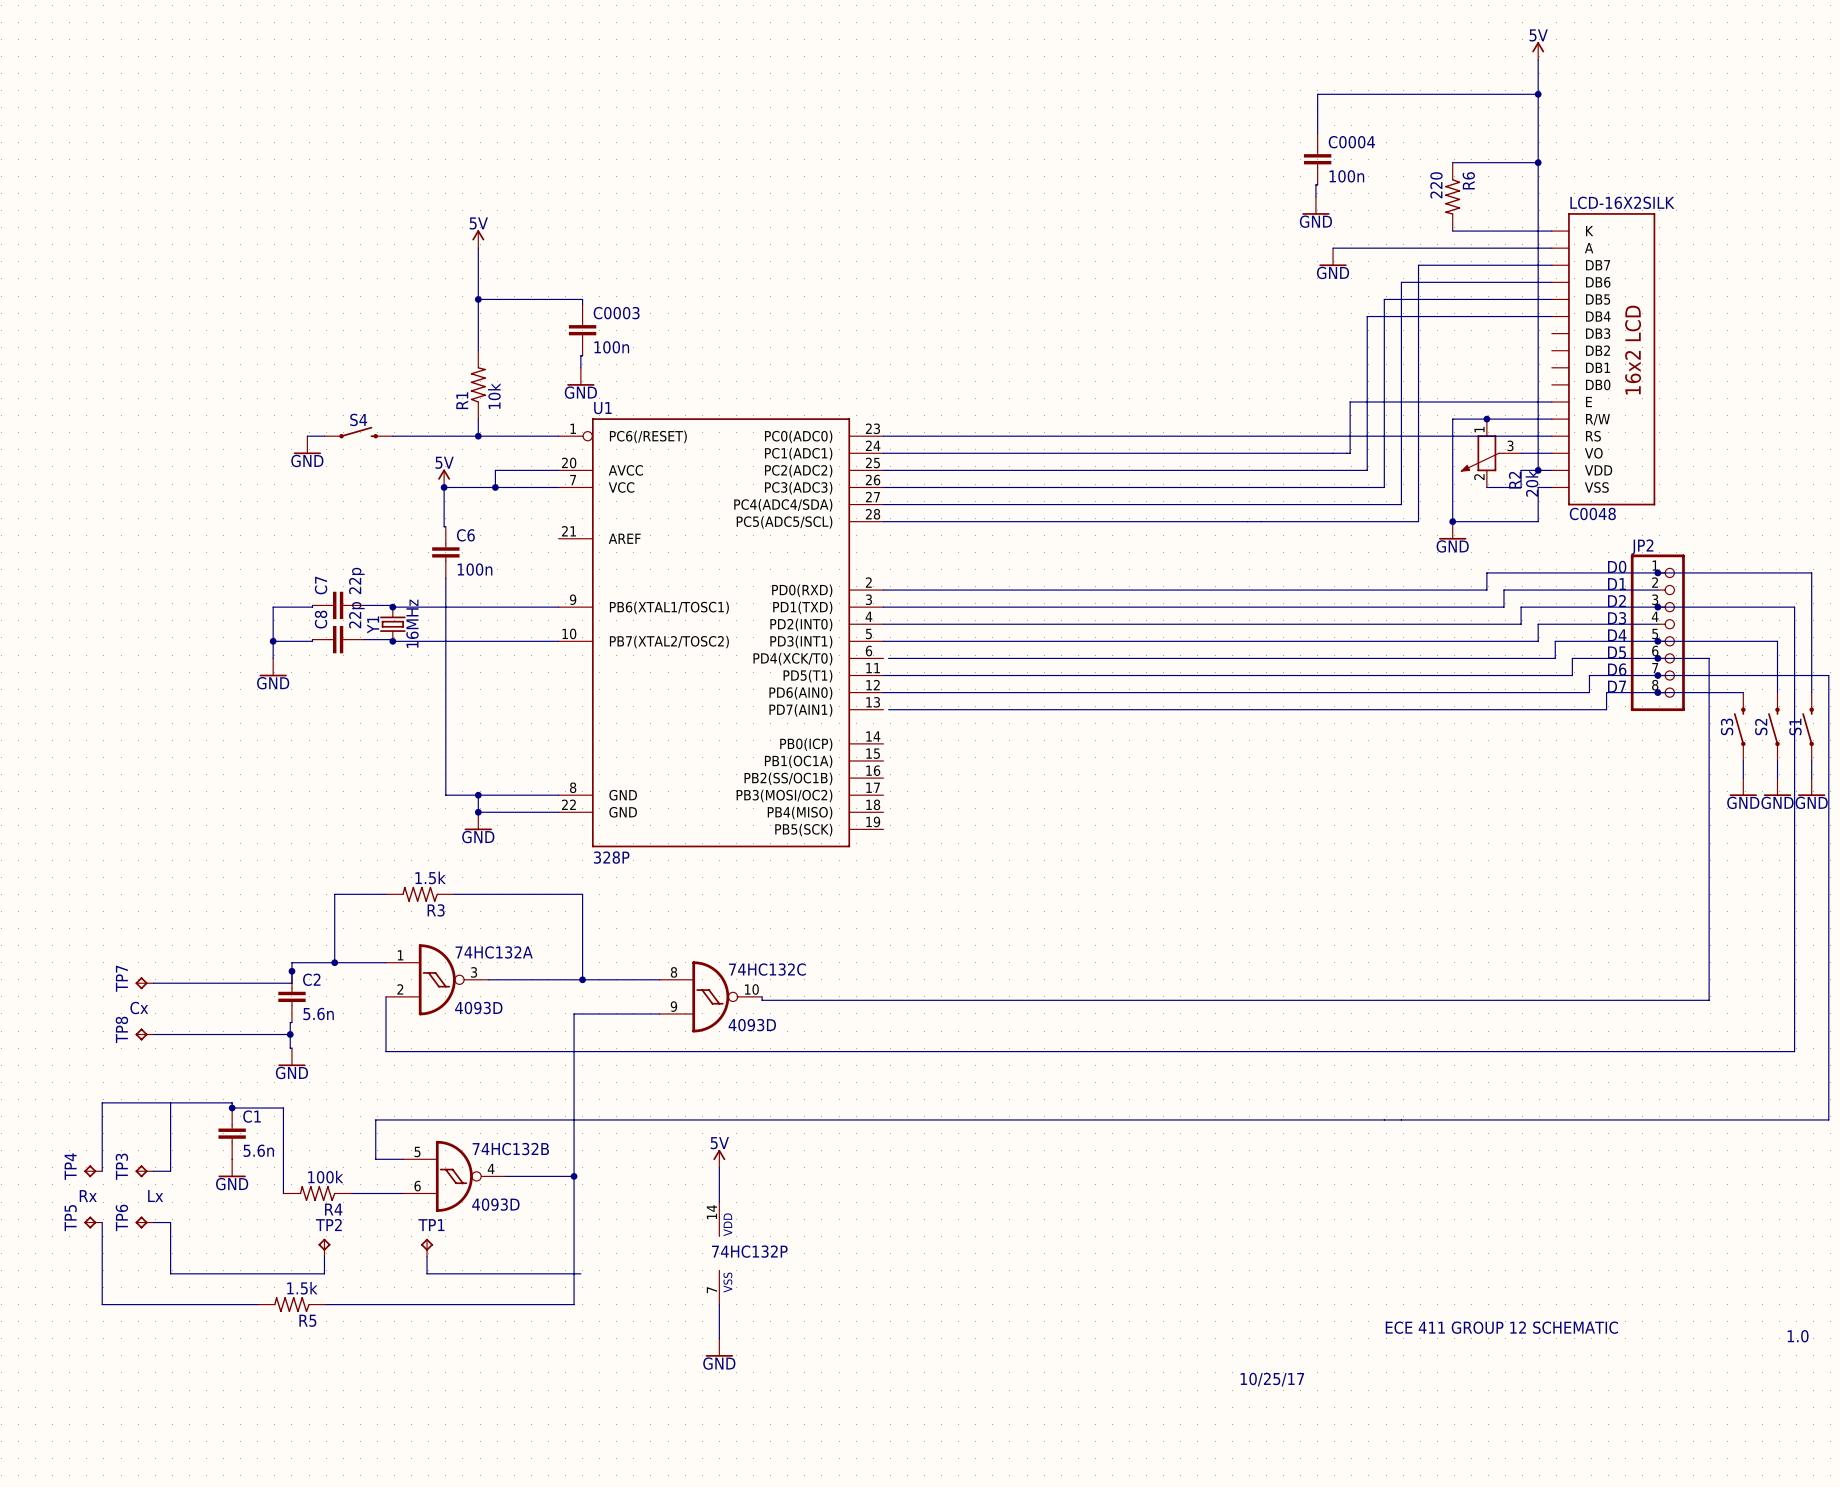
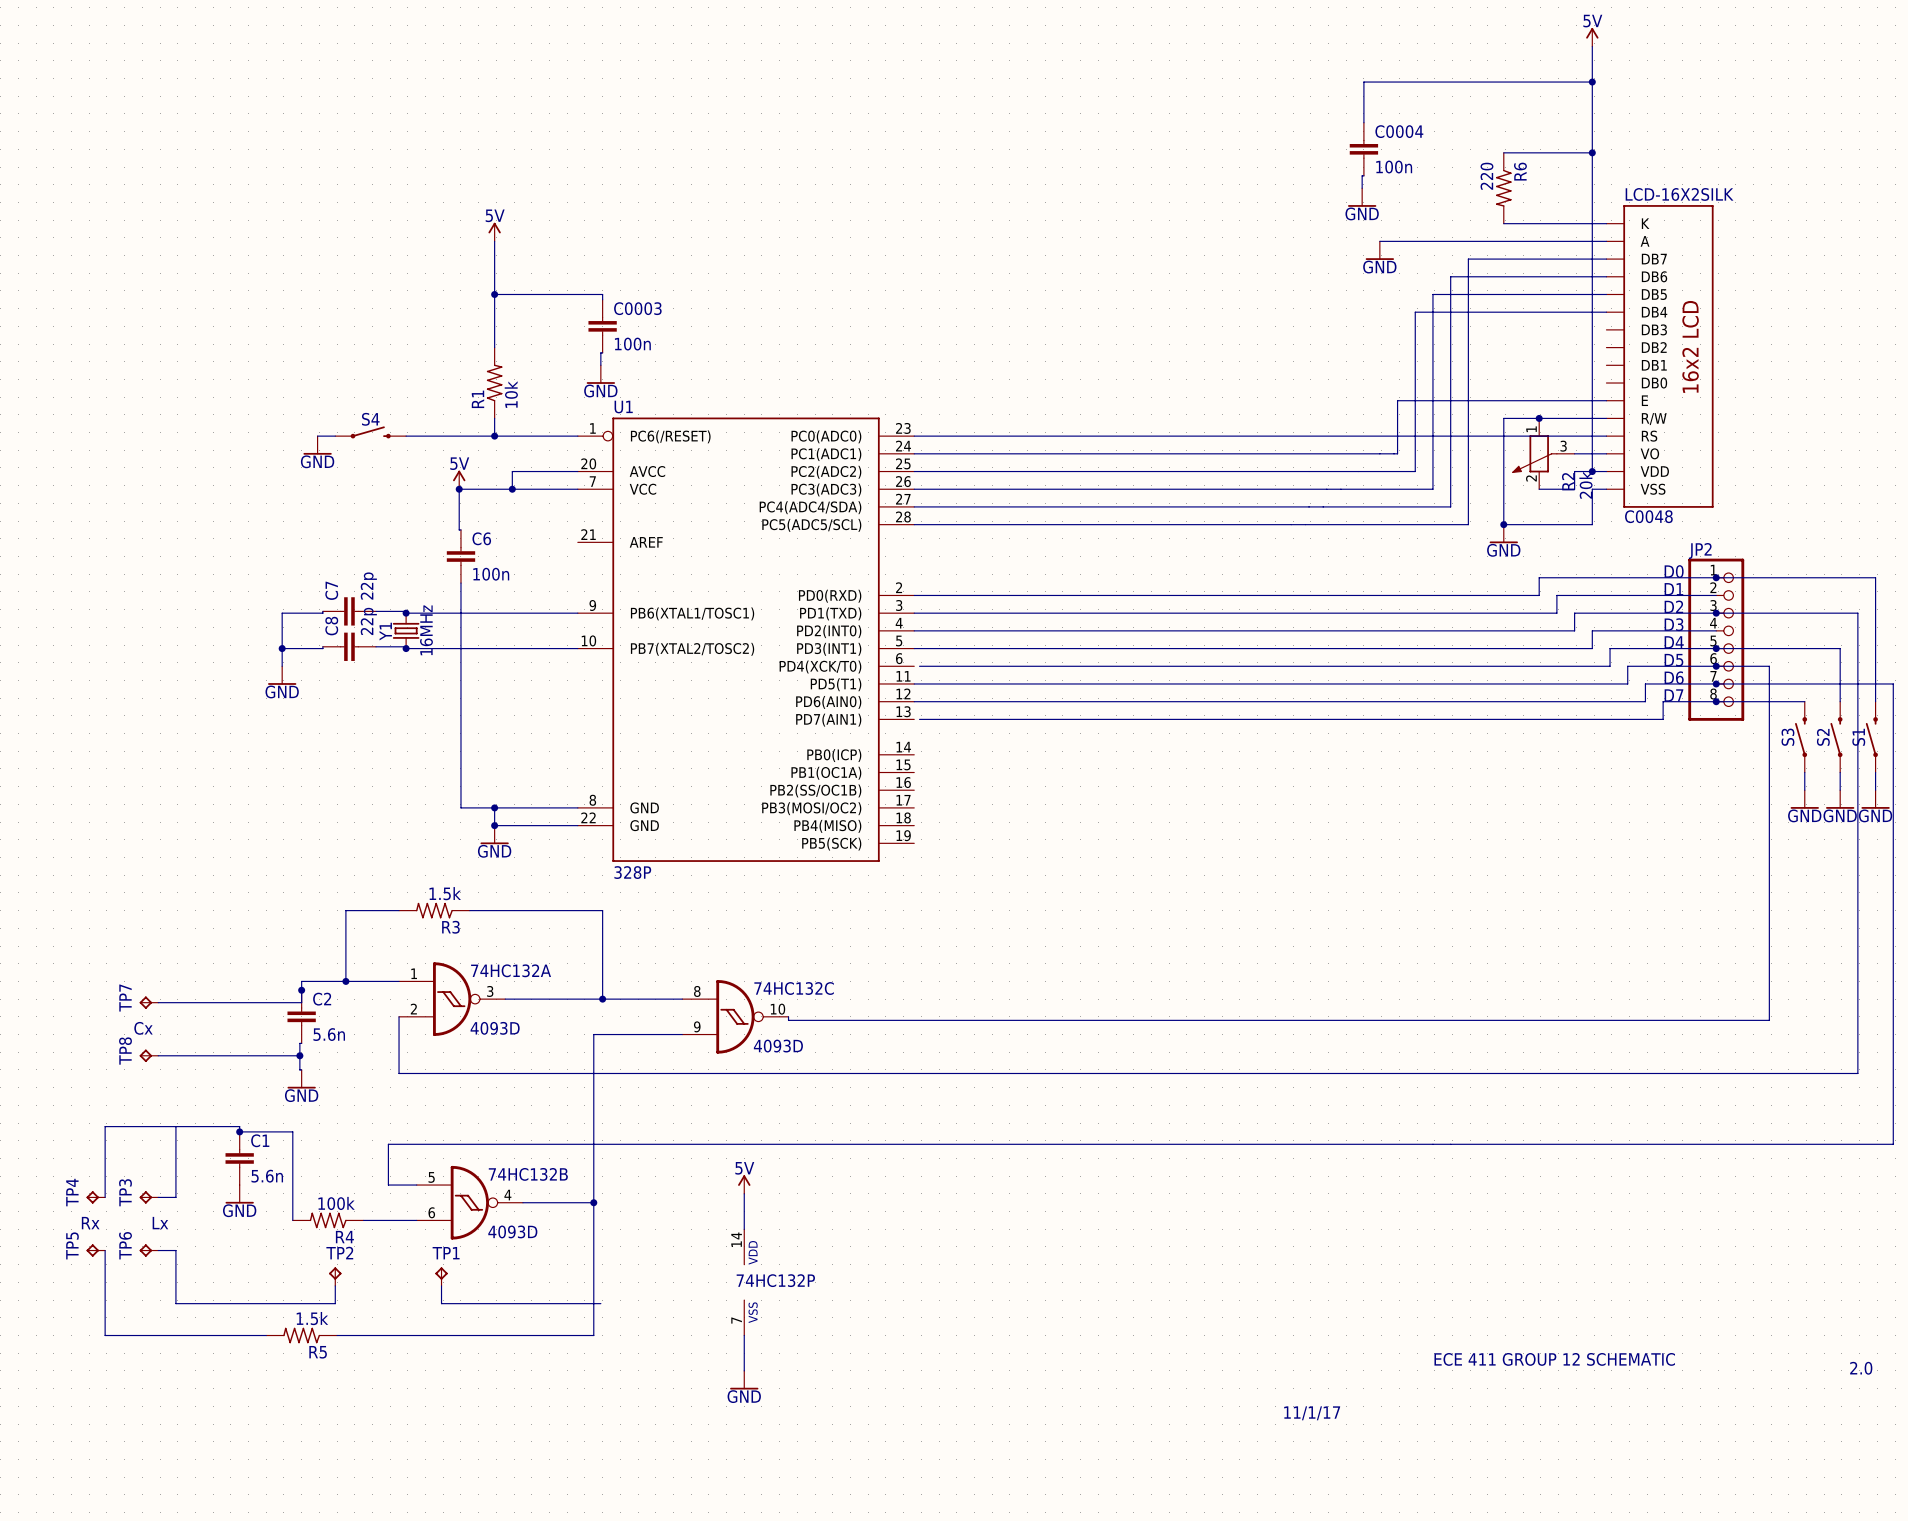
text: 1.0 (1798, 1336) -> 2.0 (1861, 1368)
text: 10/25/17 (1272, 1379) -> 11/1/17 (1312, 1413)

